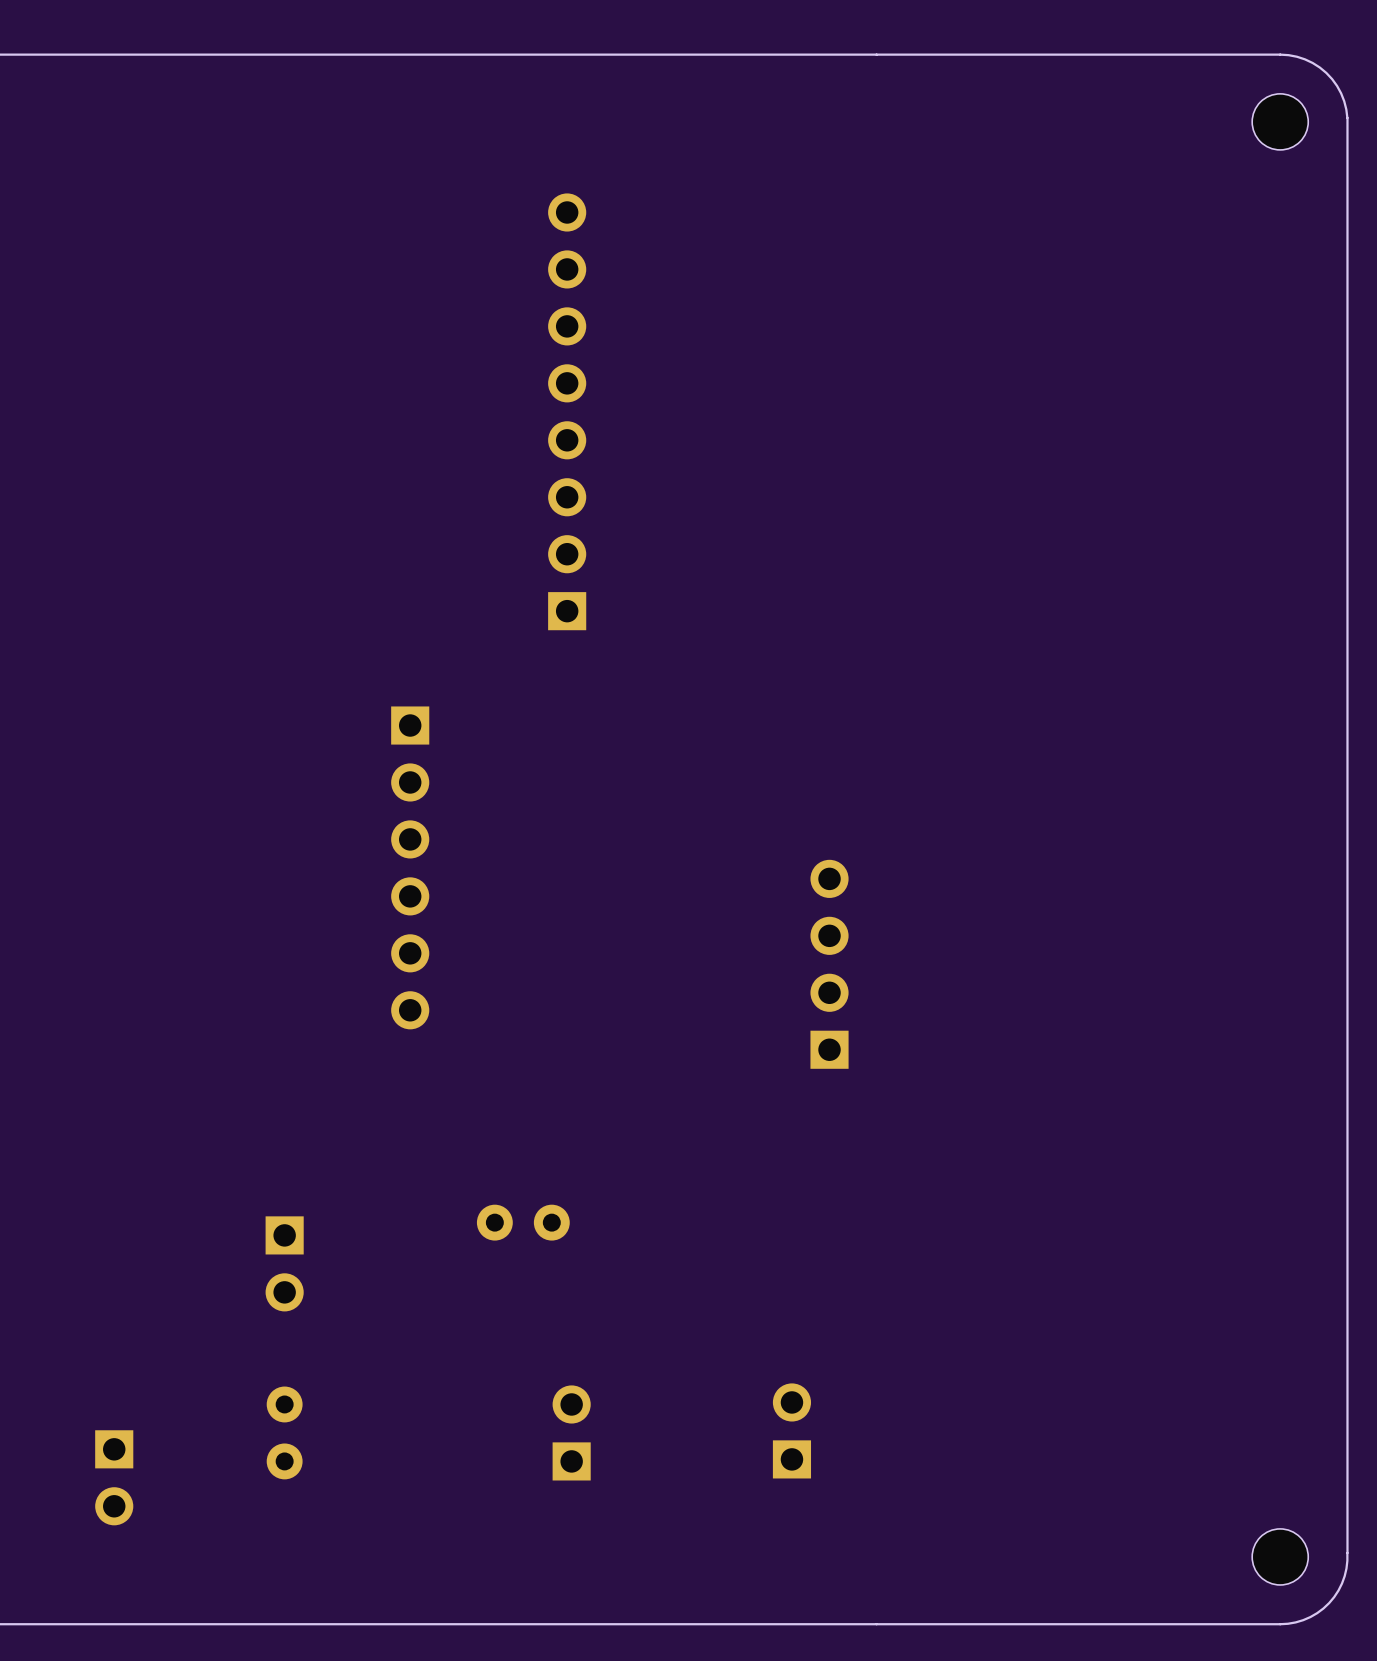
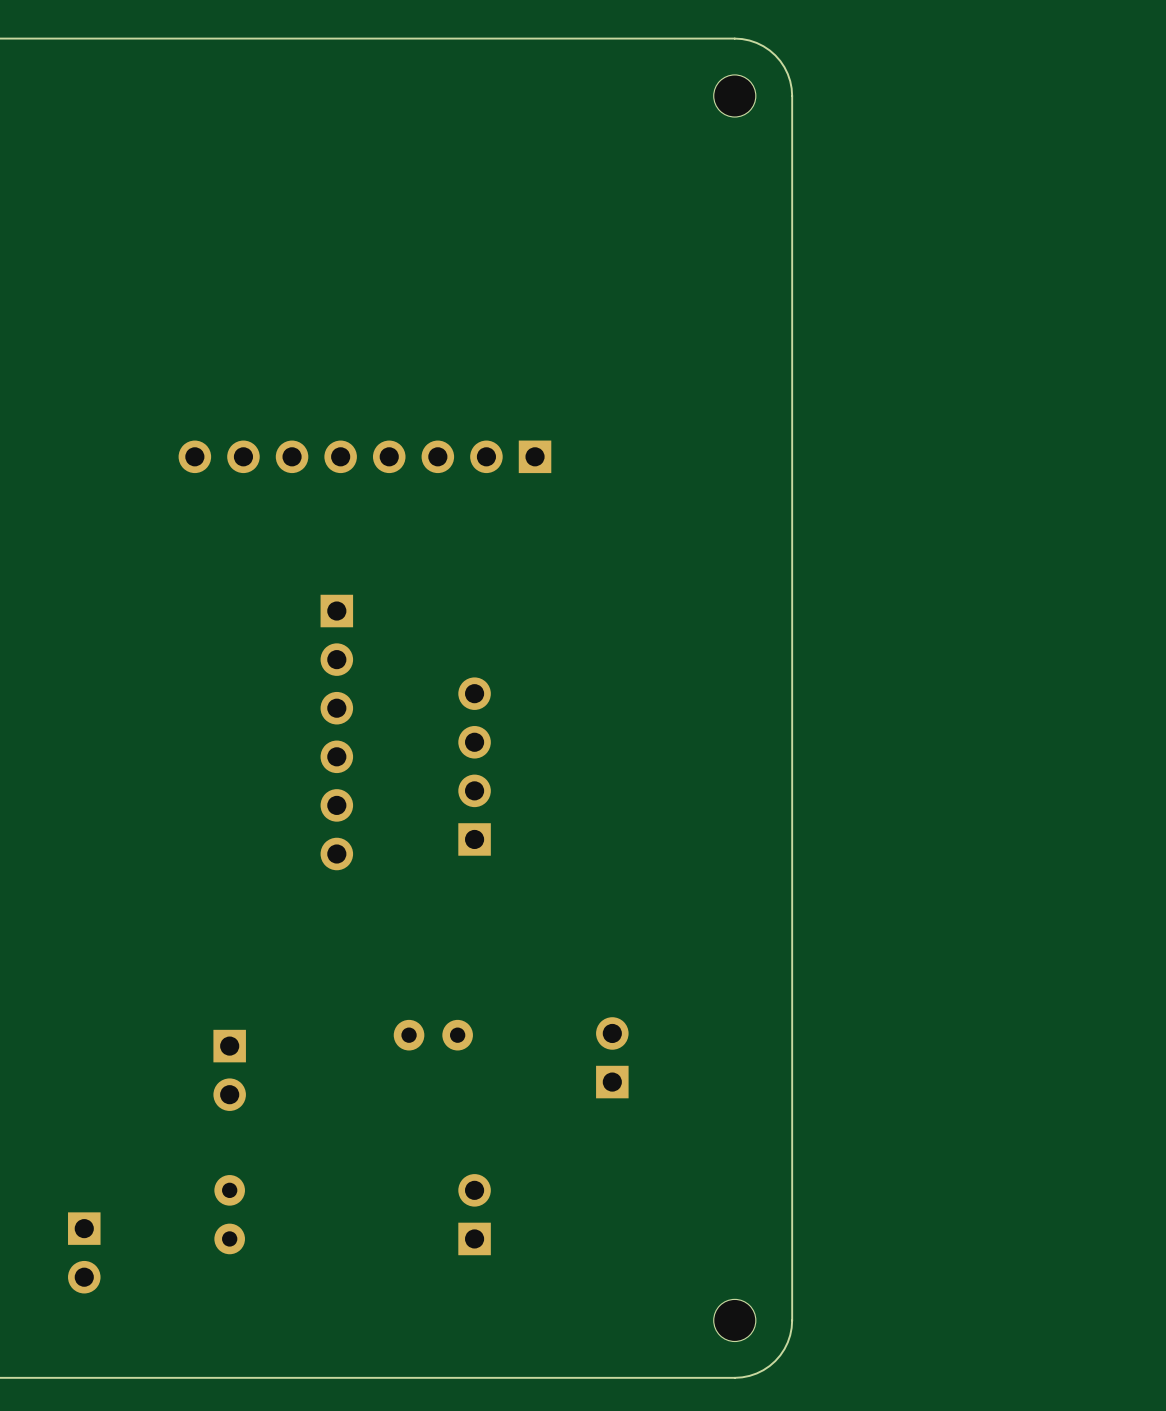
board edge: (876, 54) (1288, 55) (1312, 62) (1332, 79) (1341, 93) (1347, 117) -> none
board edge: (1347, 117) (1347, 1552) -> none
part: none -> (734, 95)
part: (1280, 121) -> none
part rotation: 0° (567, 411) -> 90° counterclockwise (364, 456)
part position: (829, 964) -> (474, 766)
part position: (791, 1430) -> (612, 1057)
board edge: (1347, 1552) (1344, 1576) (1334, 1597) (1323, 1608) (1310, 1617) (1288, 1623) (876, 1624) -> (734, 38) (756, 42) (775, 55) (787, 74) (792, 95) (792, 1320) (787, 1342) (775, 1361) (756, 1373) (734, 1377)
part: none -> (734, 1320)
part: (1280, 1556) -> none

